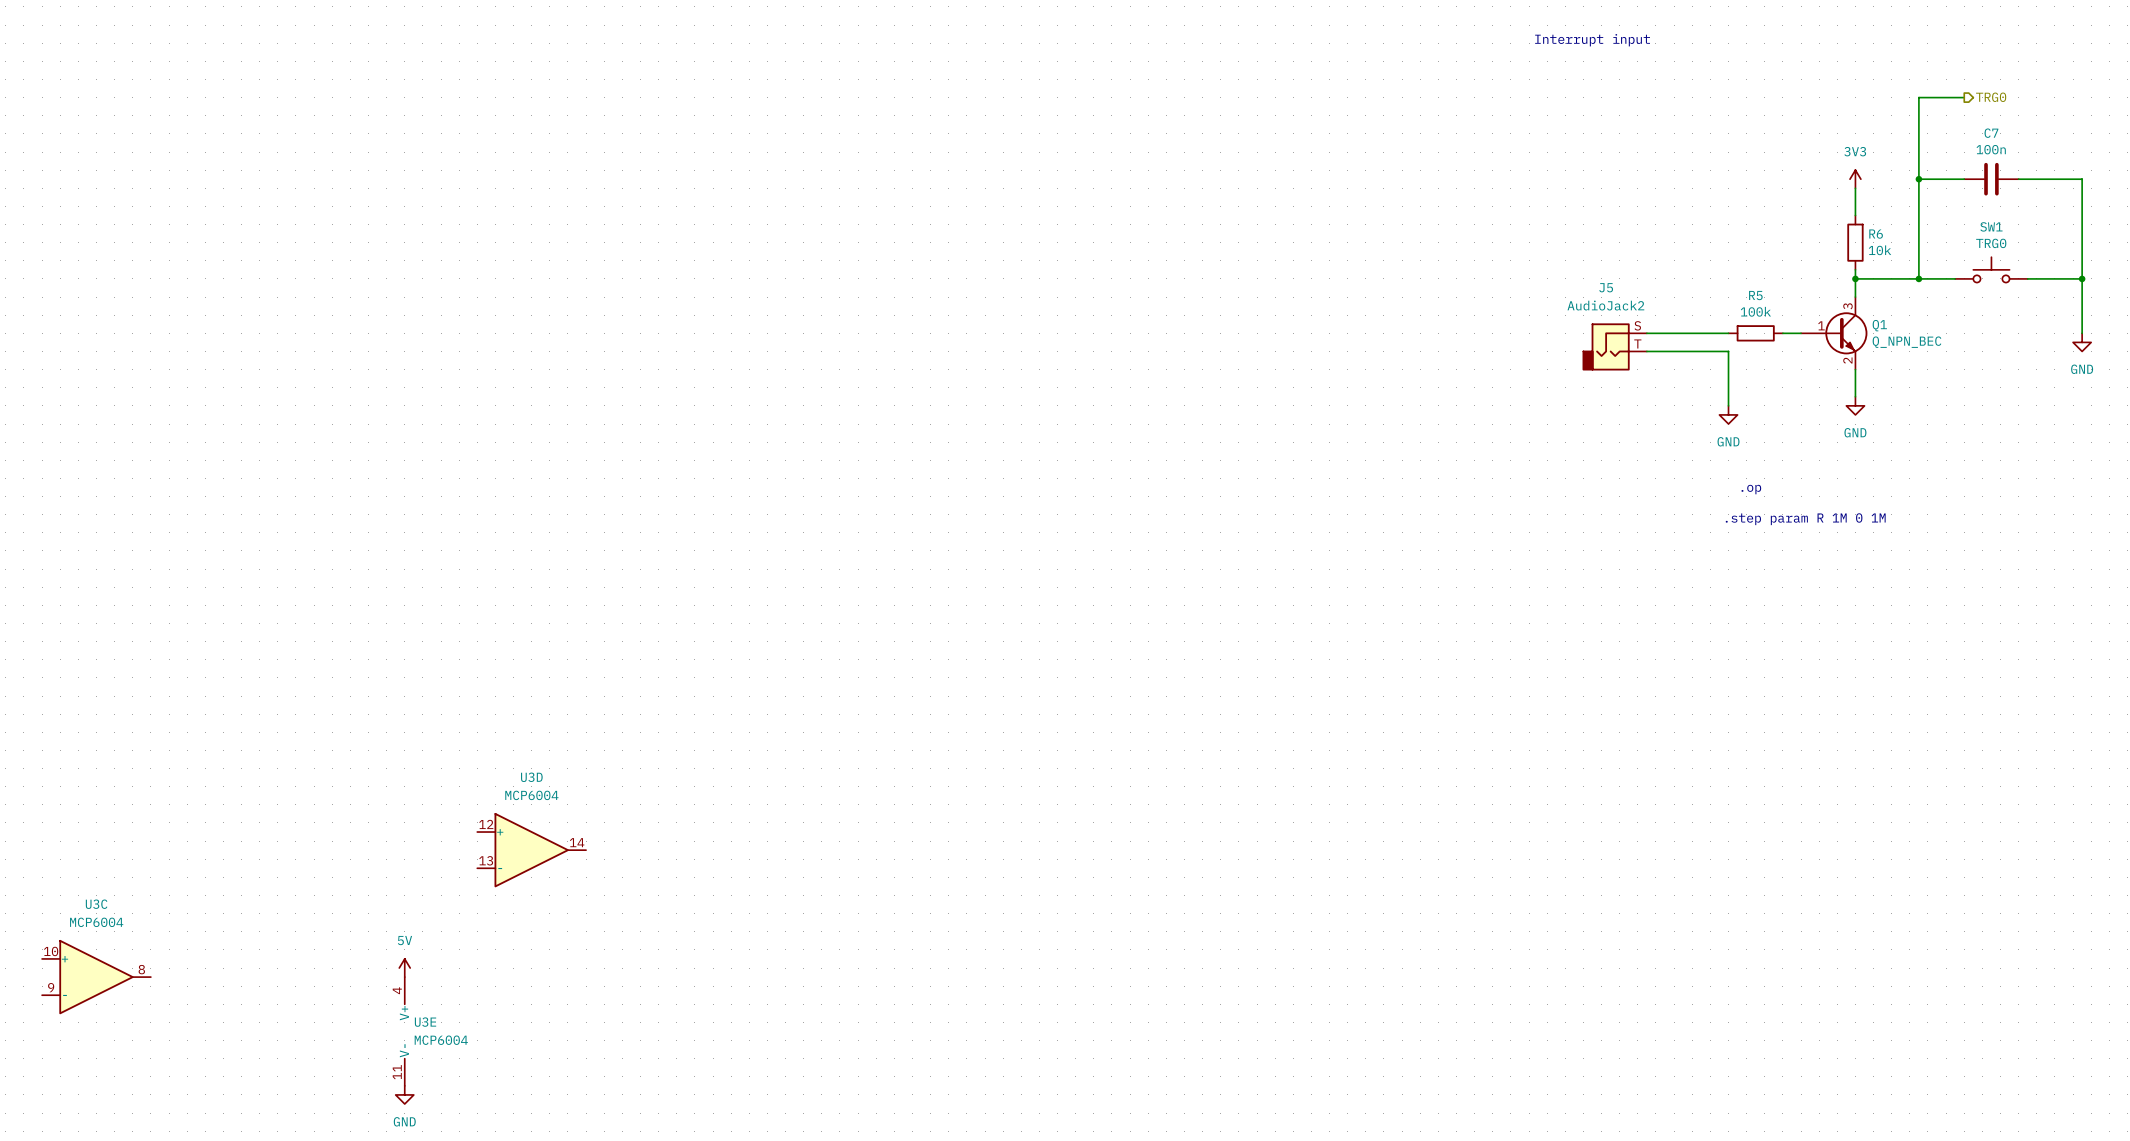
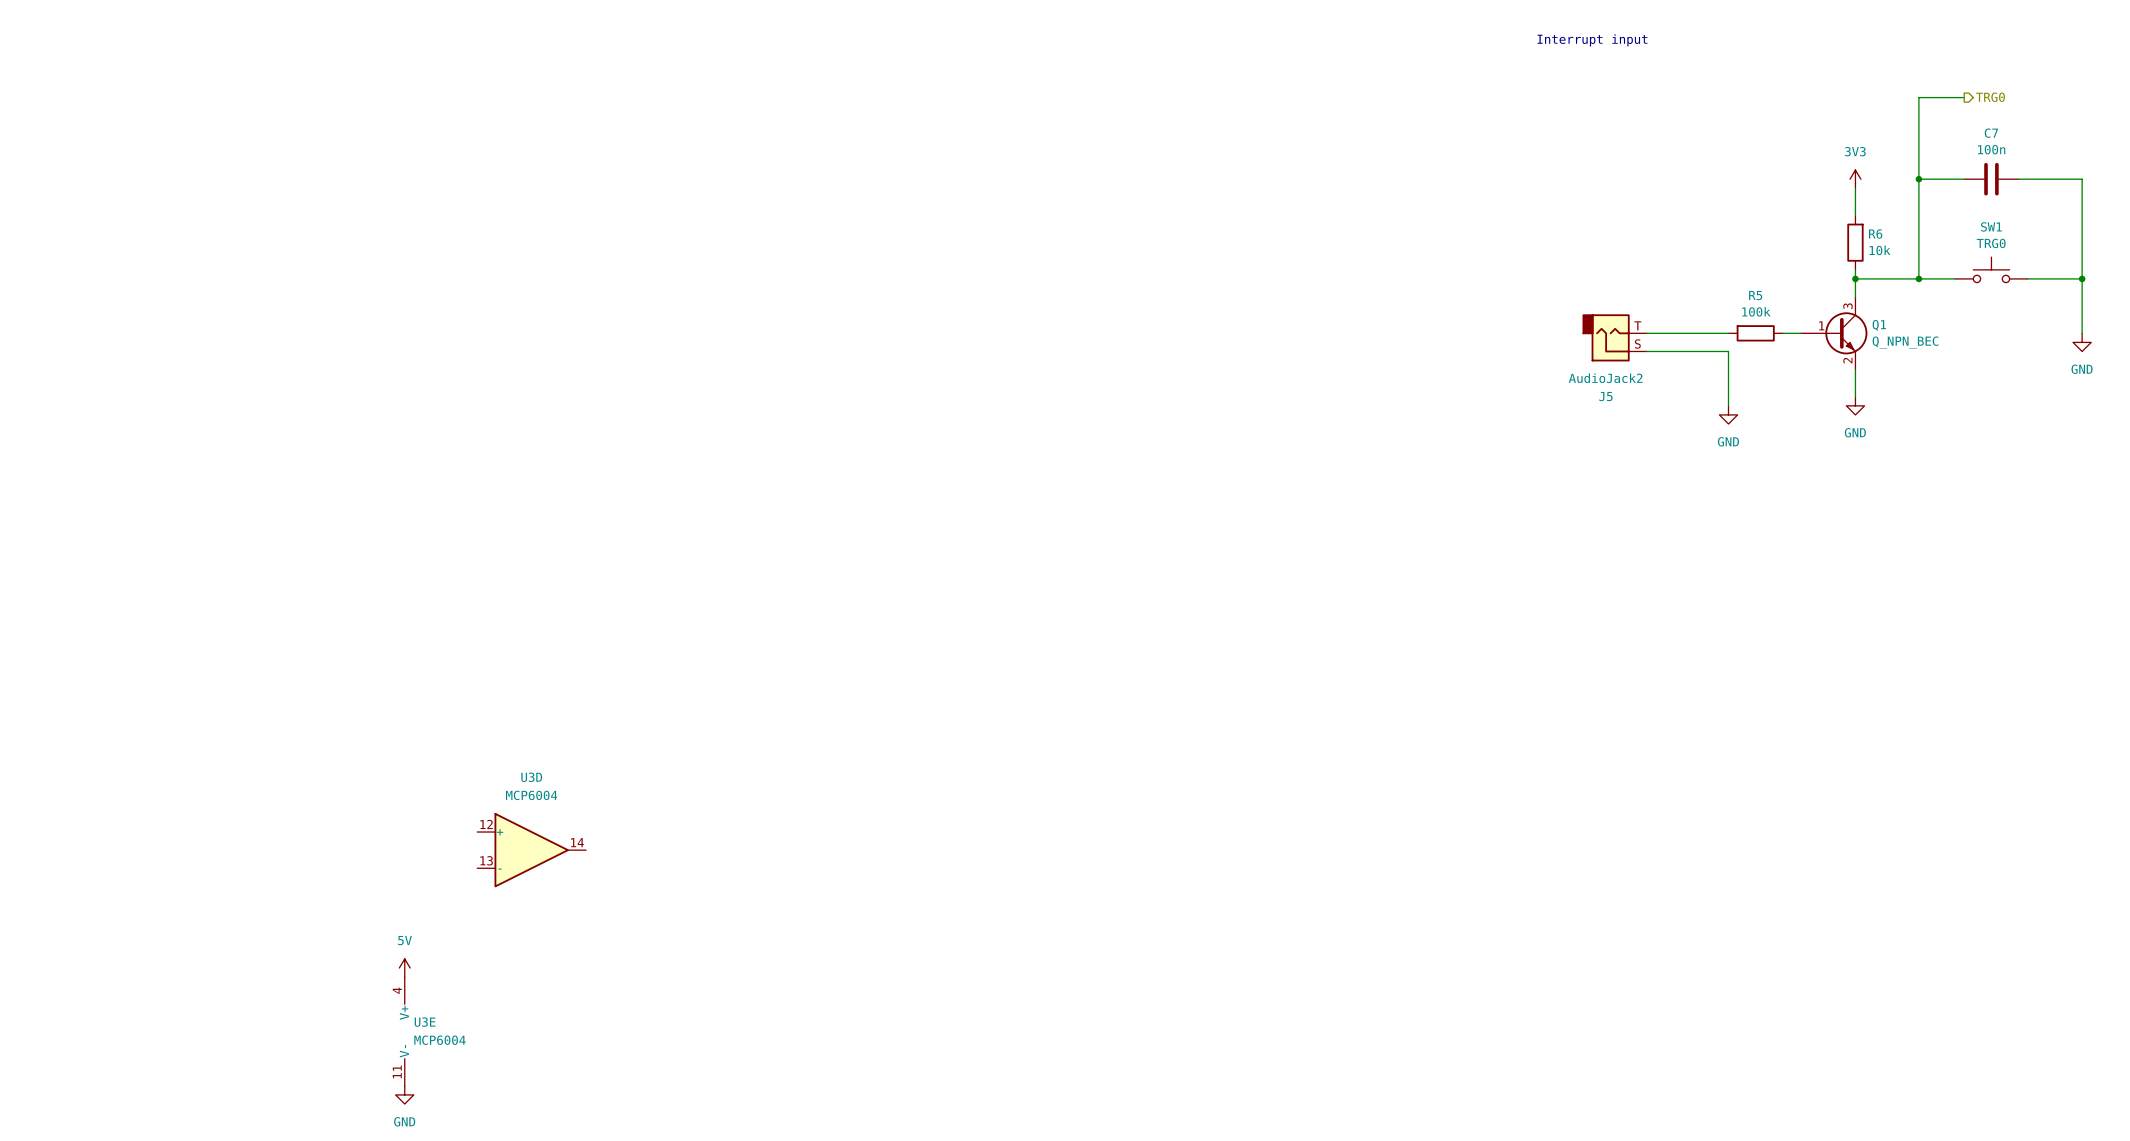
J5 flip: as is (1606, 346) -> up-down (1606, 337)
text: .op (1751, 489) -> none
text: .step param R 1M 0 1M (1805, 519) -> none
U3C: MCP6004 (96, 977) -> none

